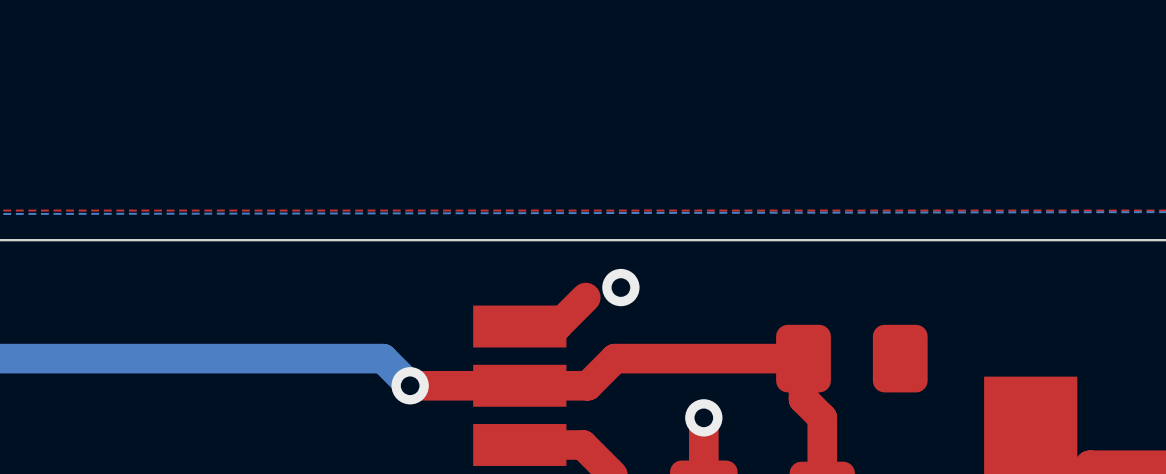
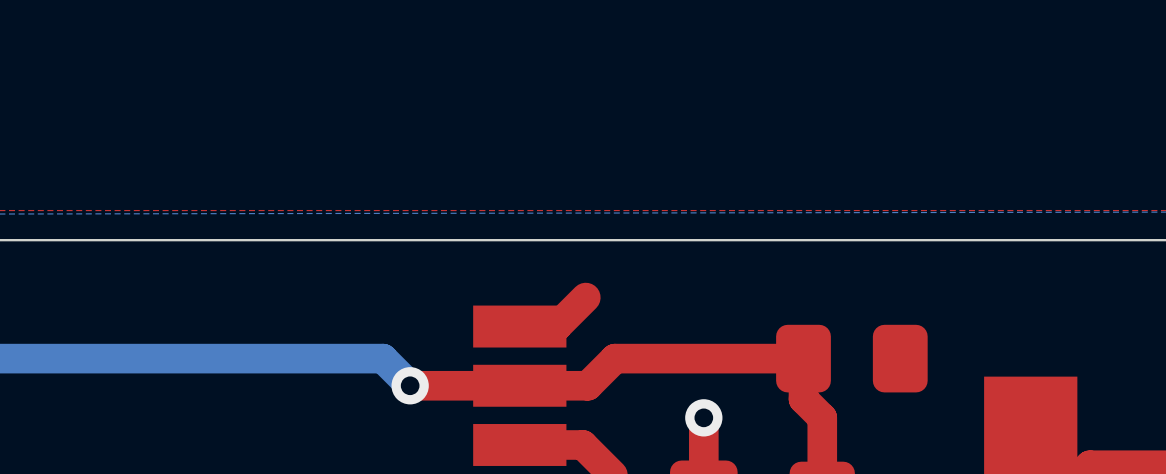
via: (620, 287) -> none

